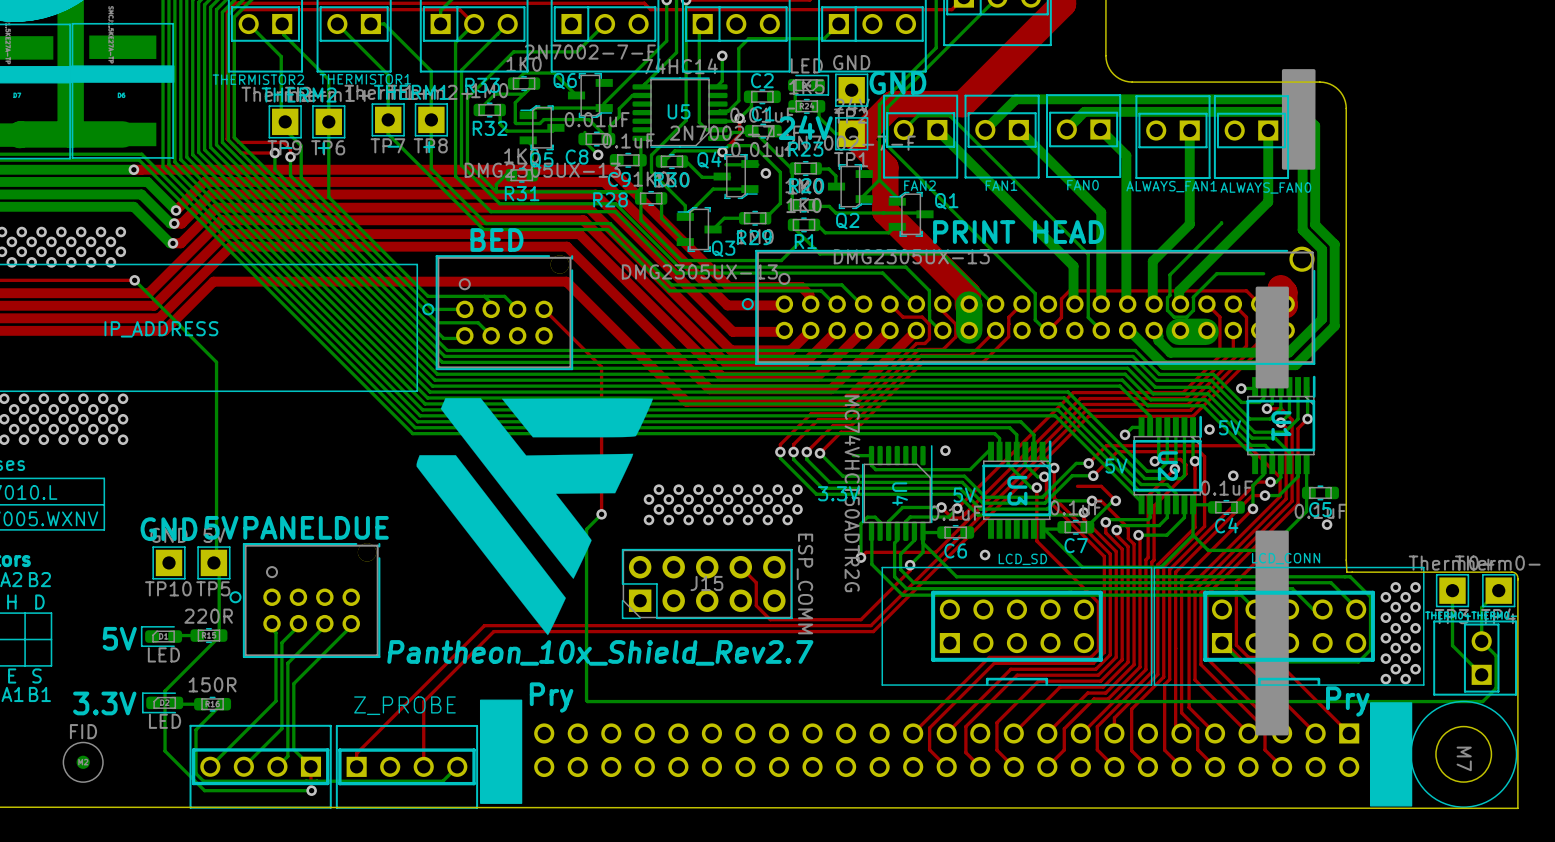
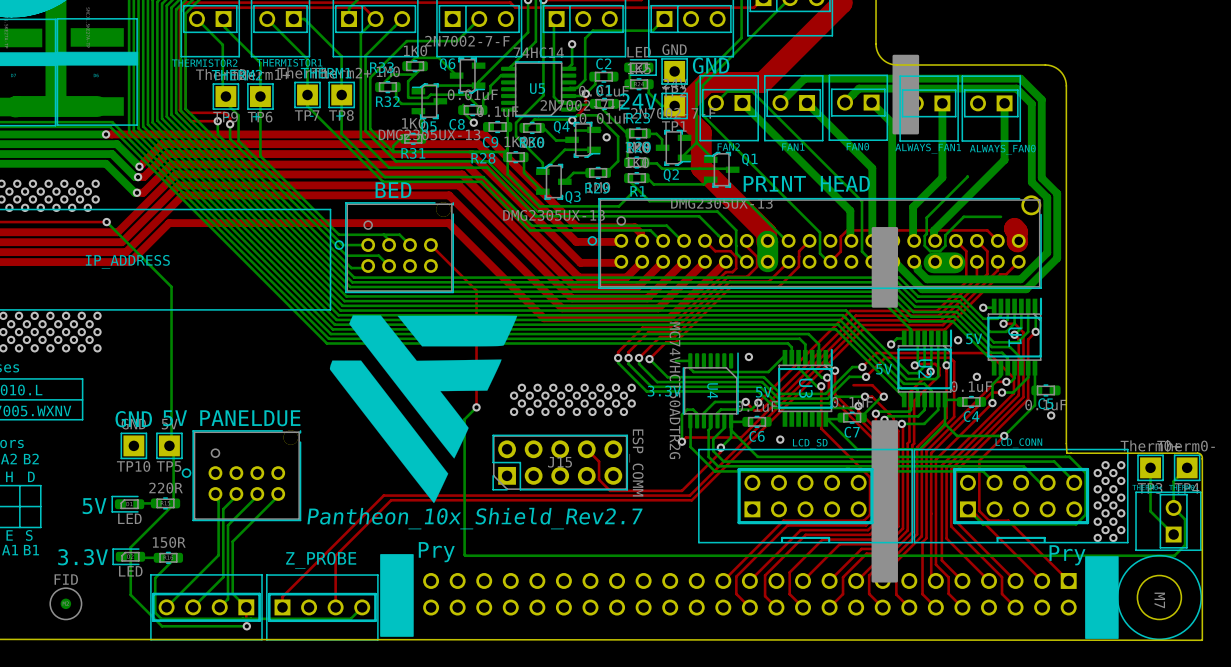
drawing position: (1298, 119) -> (905, 94)
drawing position: (1272, 337) -> (884, 267)
drawing position: (1272, 633) -> (884, 501)

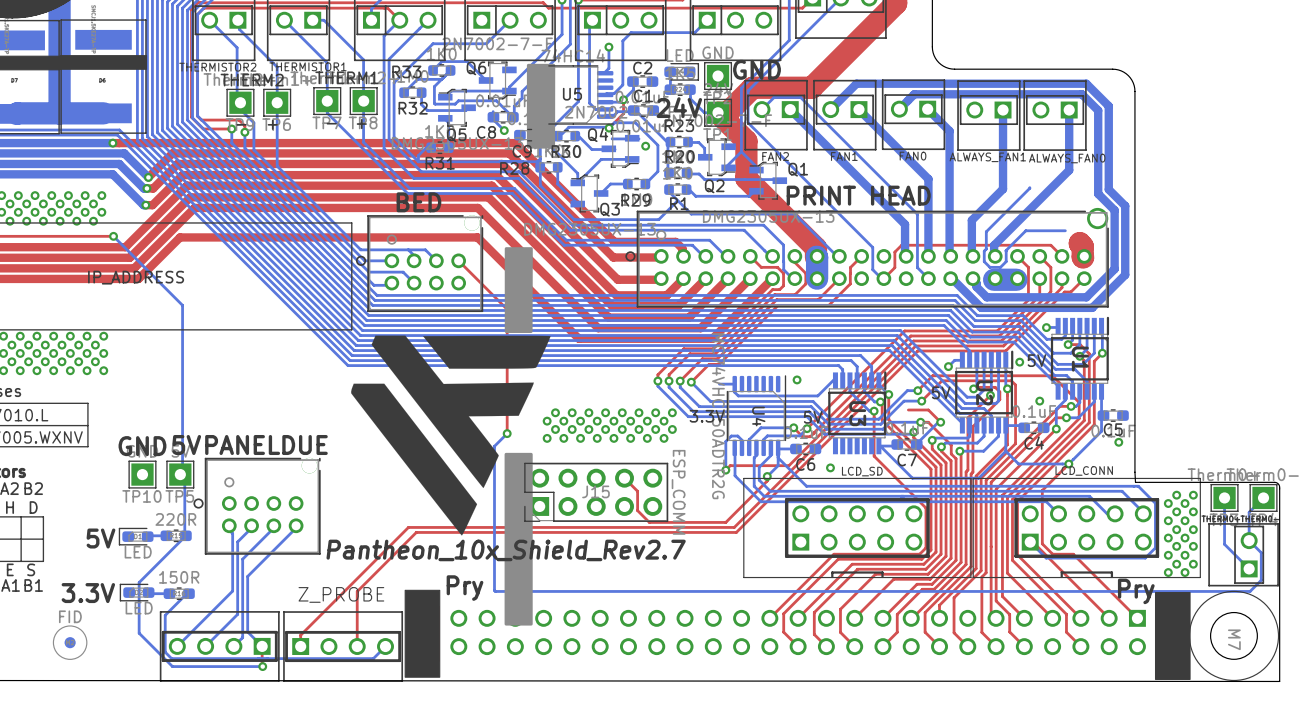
drawing: [892, 54, 920, 135] -> none
drawing: none -> [526, 63, 556, 149]
drawing: [871, 227, 899, 308] -> none
drawing: none -> [504, 247, 533, 334]
drawing: [871, 420, 898, 583] -> none
drawing: none -> [504, 452, 533, 626]

